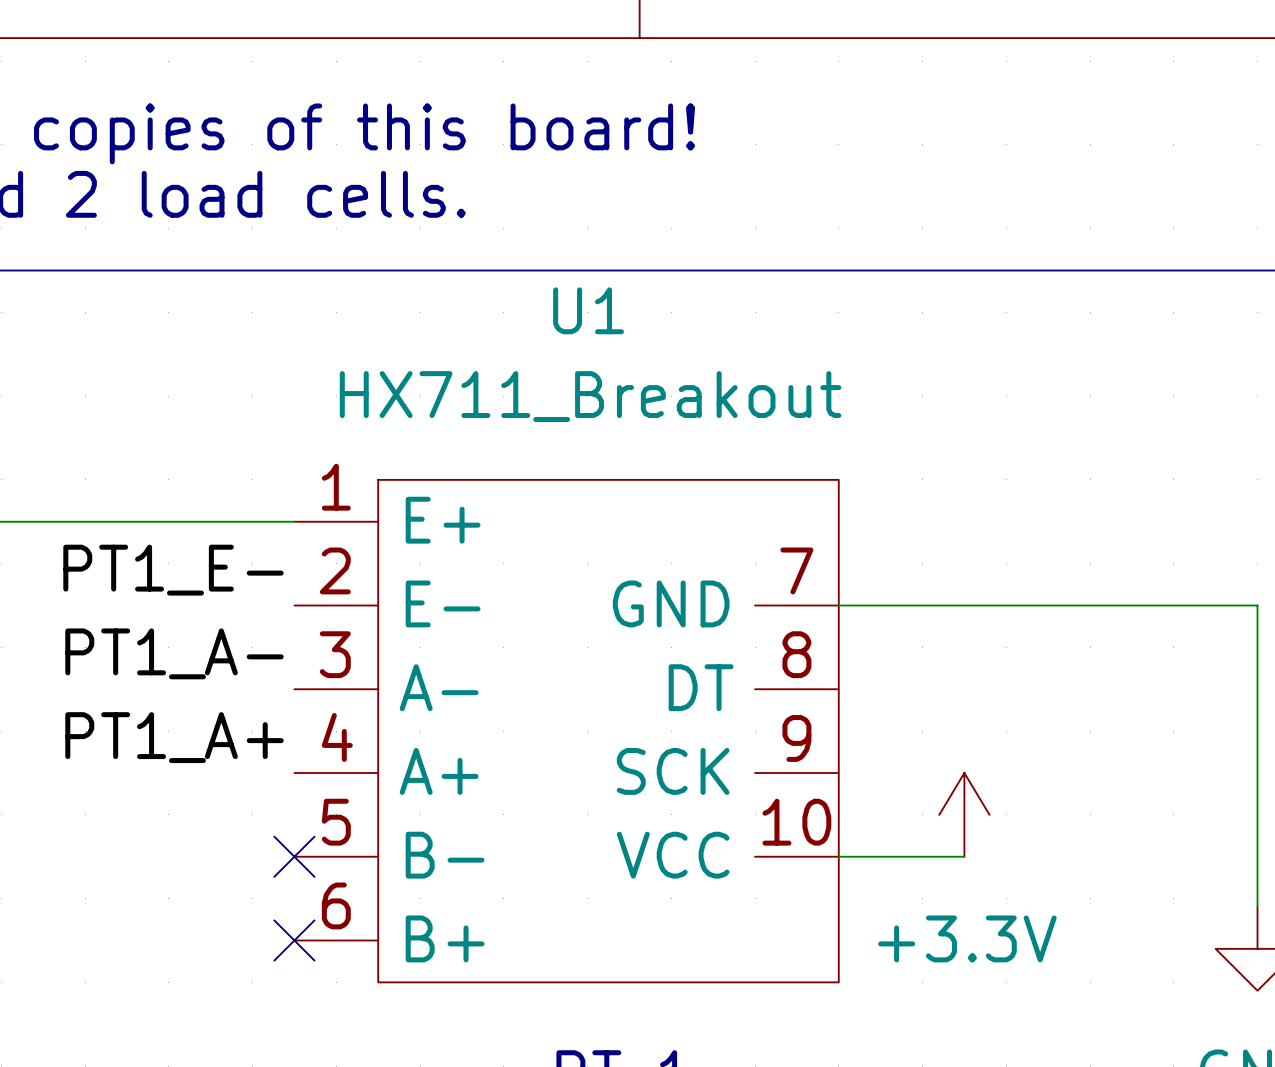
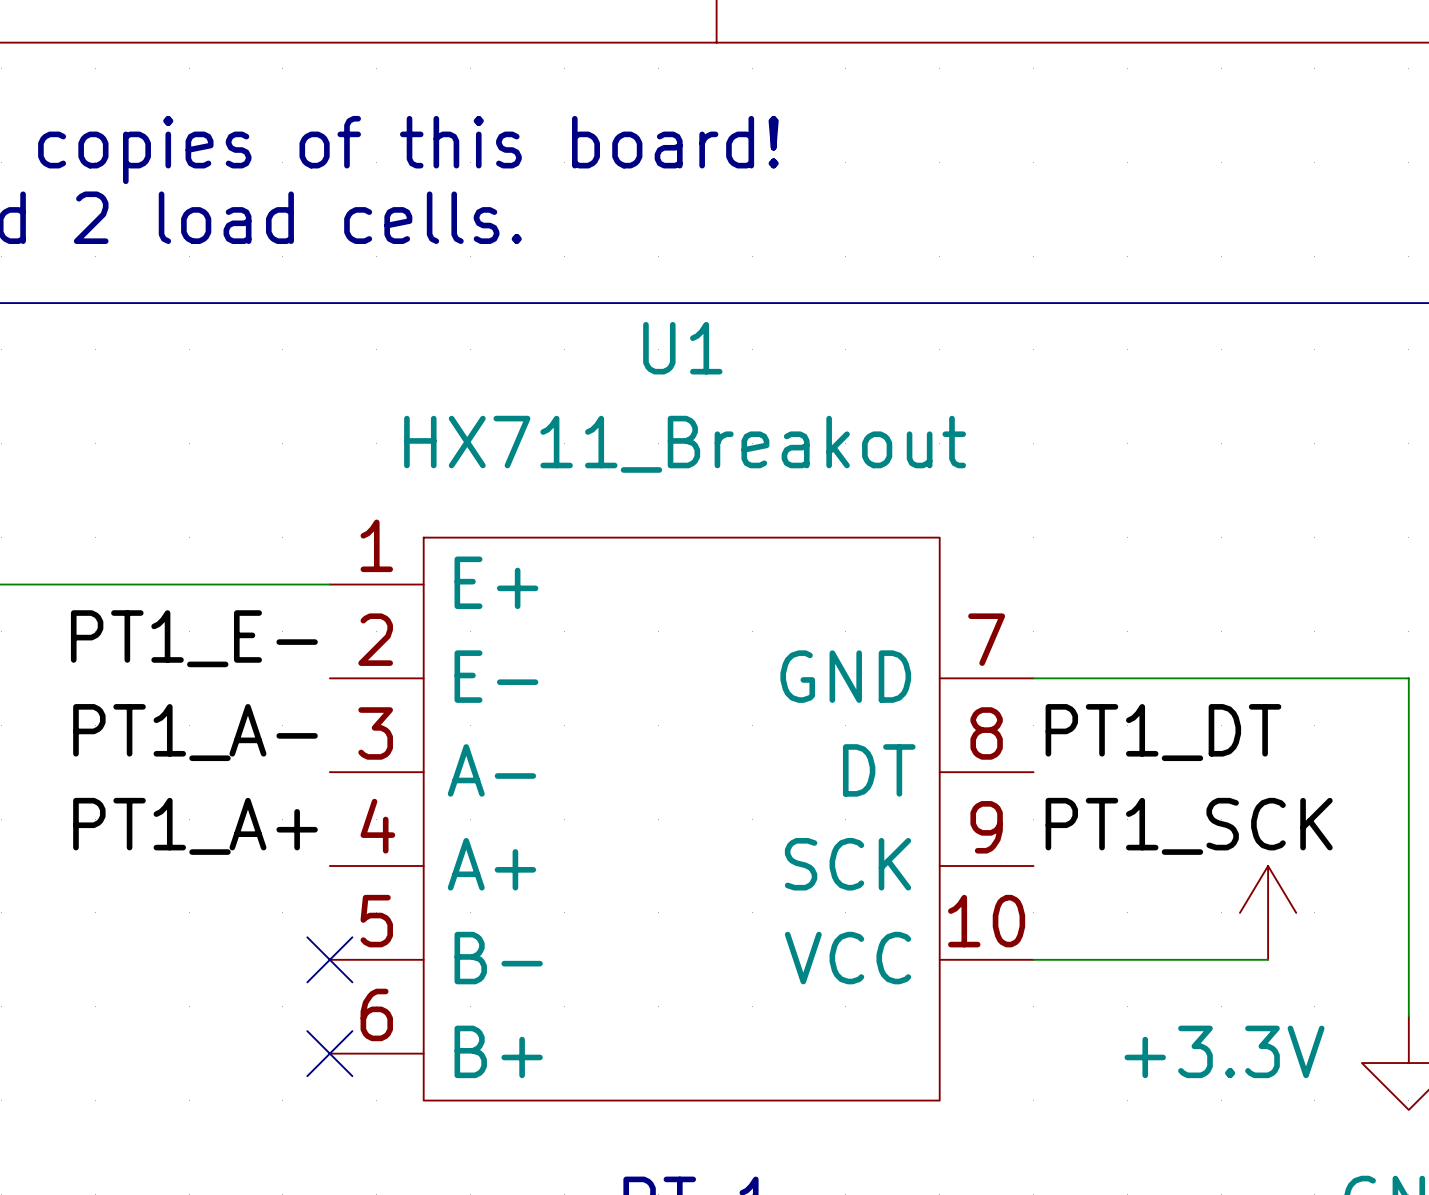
U1 symbol: [294, 479, 839, 983] -> [329, 537, 1034, 1101]
label: none -> PT1_DT (1163, 732)
label: none -> PT1_SCK (1189, 826)
power symbol position: +3.3V (964, 814) -> +3.3V (1268, 912)
wire: none -> (1080, 959) (1268, 959)
power symbol text position: +3.3V (967, 938) -> +3.3V (1224, 1051)

